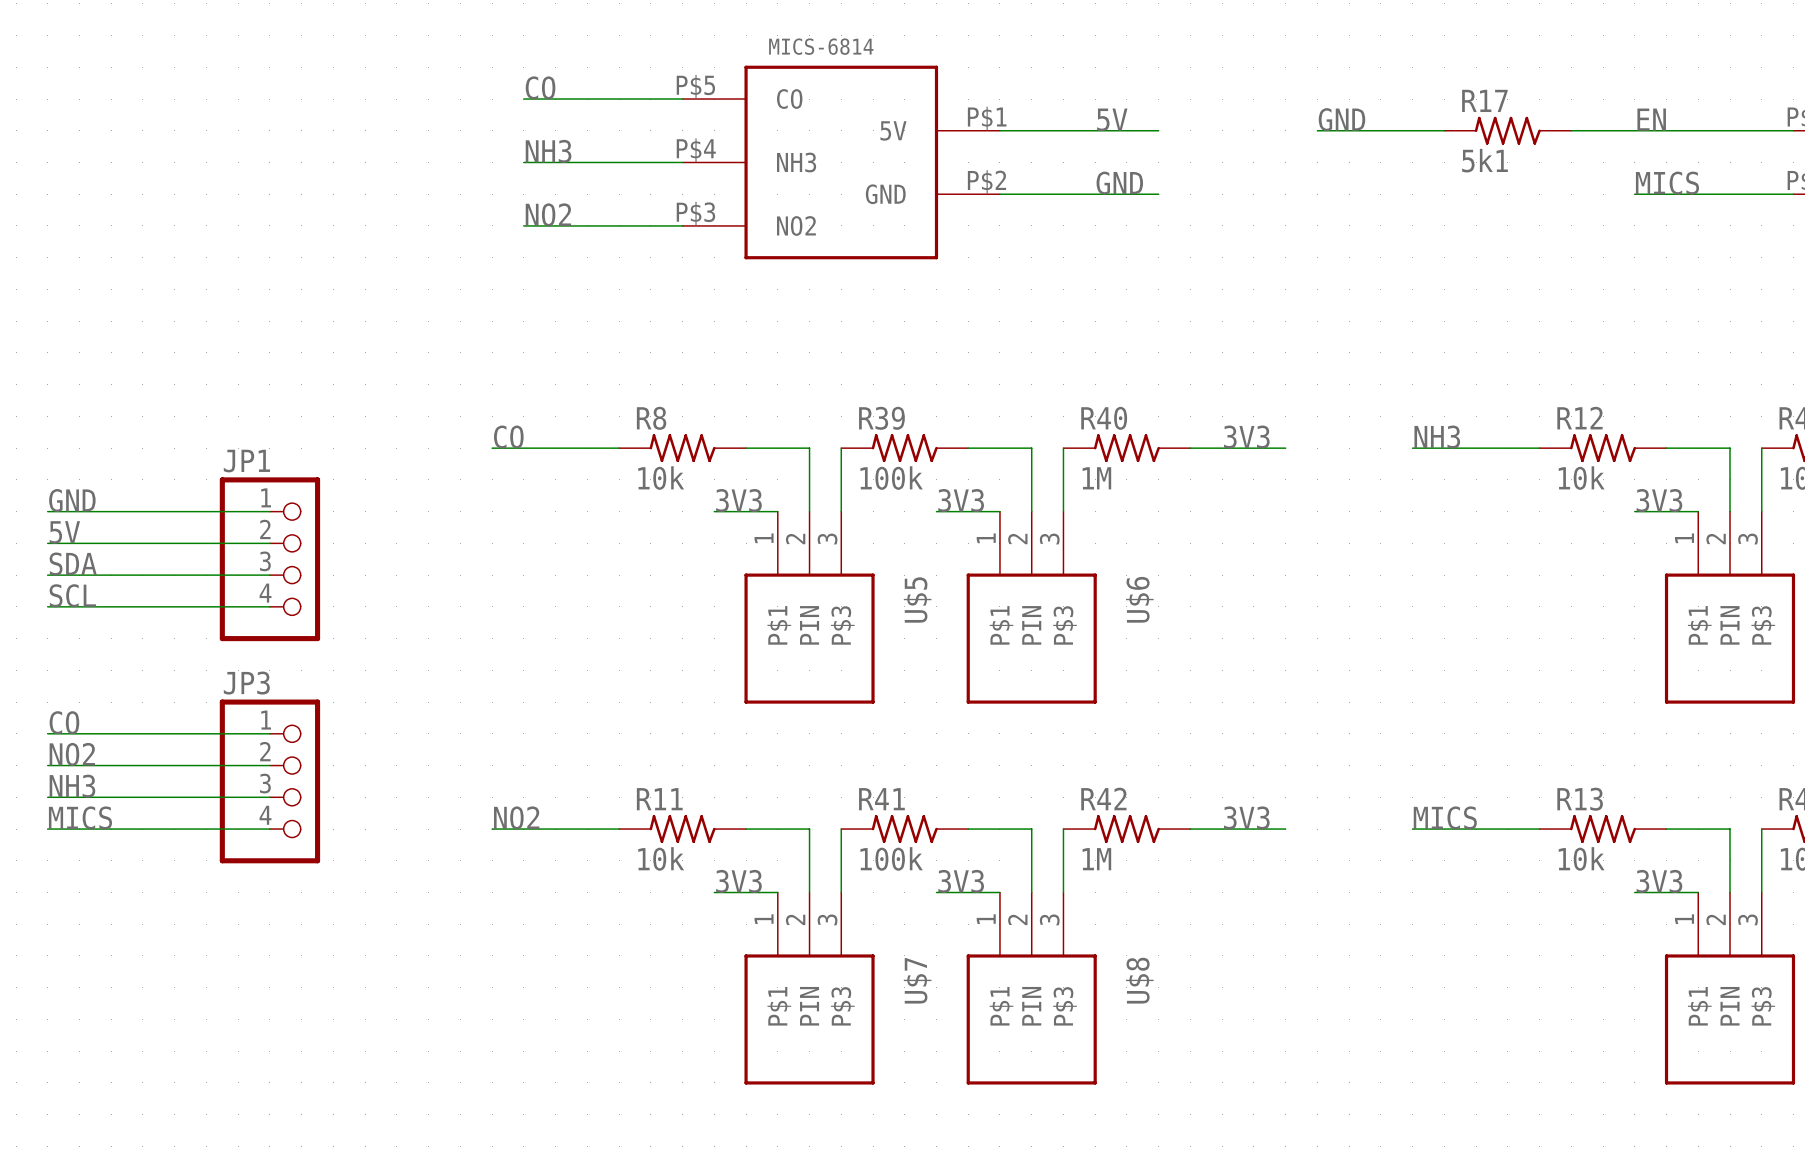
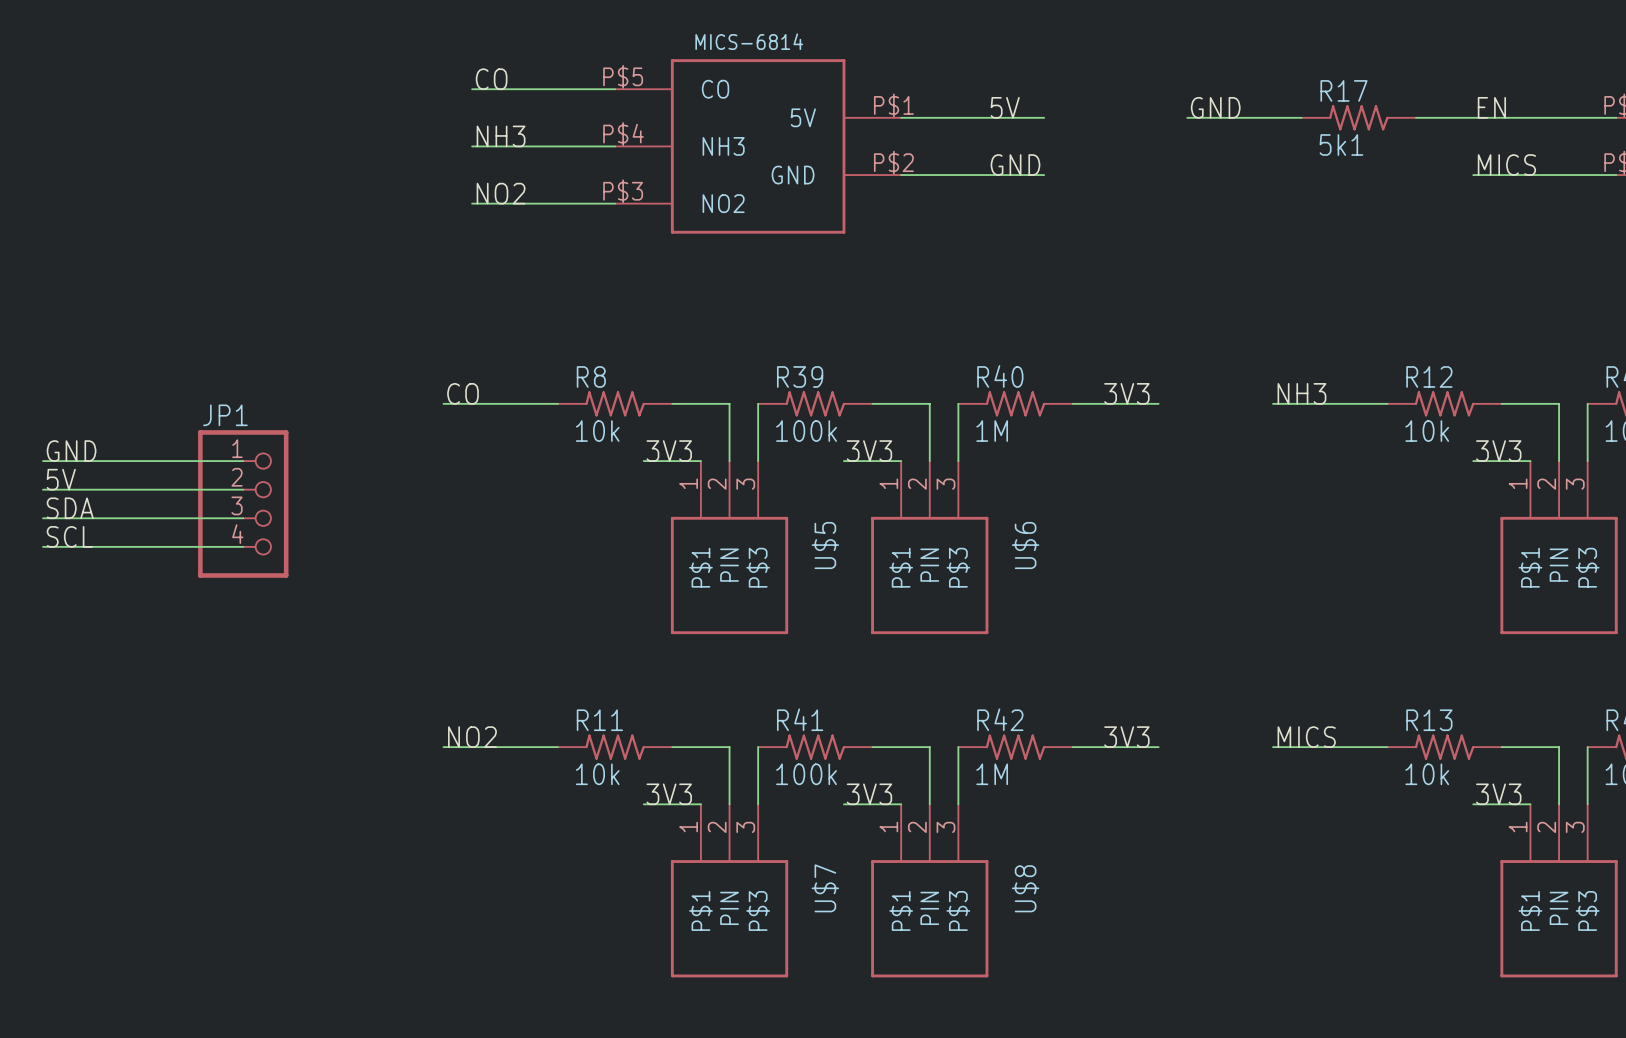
label: CO (64, 722) -> none
wire: (47, 733) (269, 733) -> none
label: NO2 (72, 754) -> none
wire: (47, 765) (269, 765) -> none
JP3: (269, 781) -> none
label: NH3 (72, 786) -> none
wire: (47, 797) (269, 797) -> none
label: MICS (80, 817) -> none
wire: (47, 829) (269, 829) -> none

